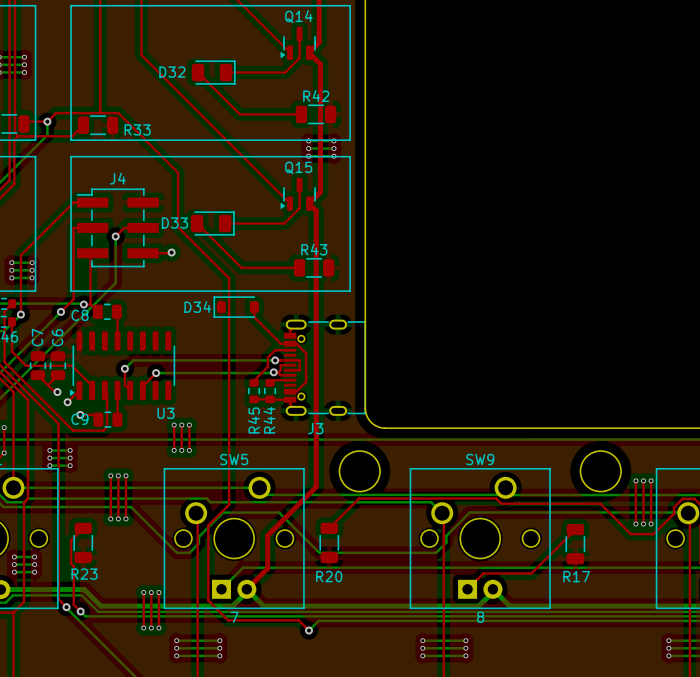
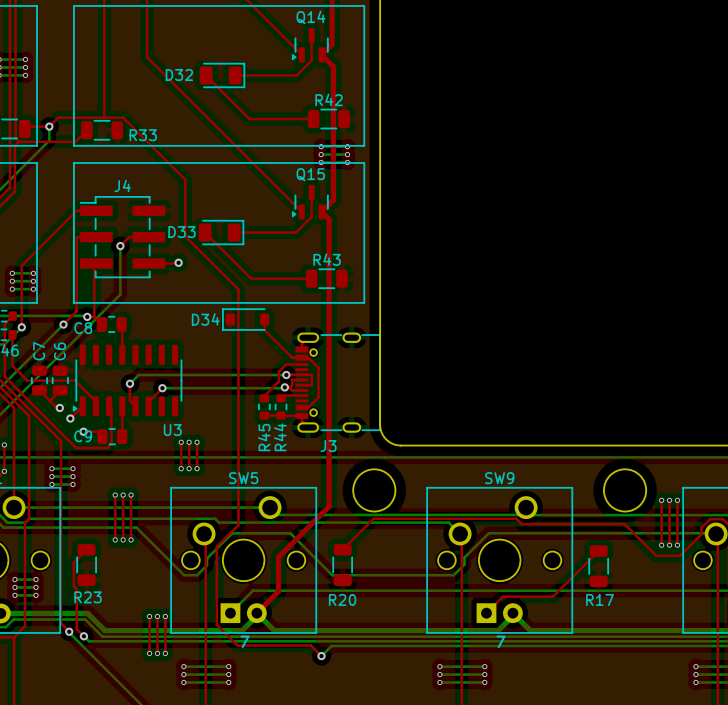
SW5 text: none -> 7 (244, 641)
SW9 text: none -> 7 (501, 641)
SW5 value: 7 (234, 617) -> none
SW9 value: 8 (480, 617) -> none

